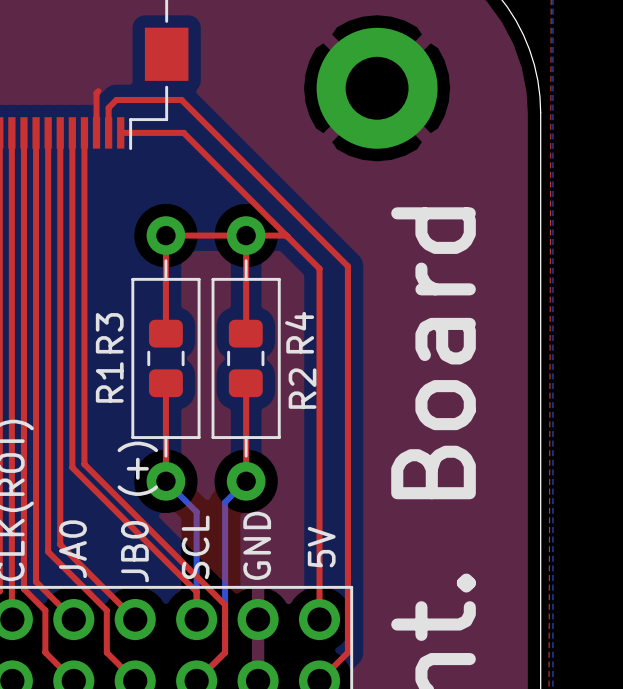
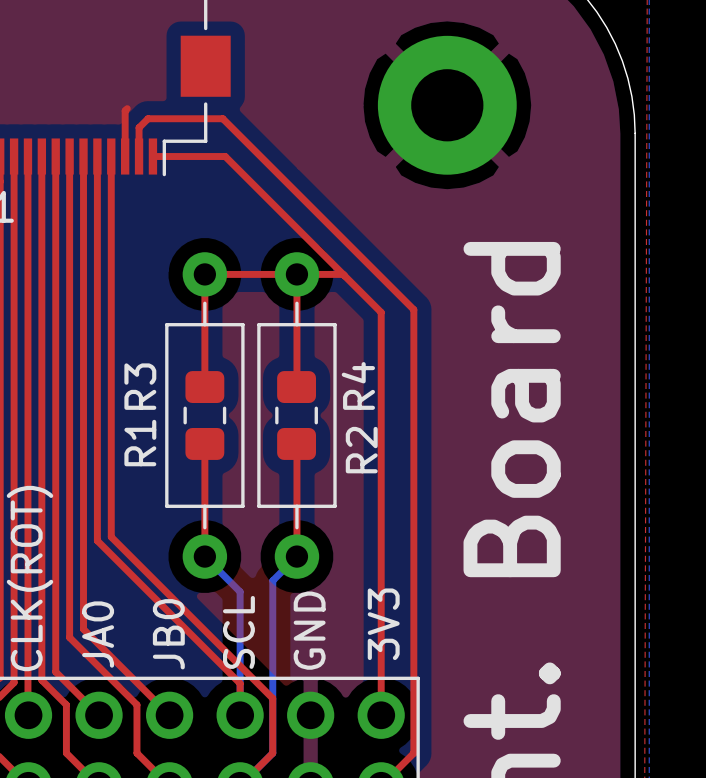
text: JB0 (+) (137, 511) -> none
text: 5V (321, 547) -> 3V3 (383, 624)
text: none -> JB0 (168, 634)

